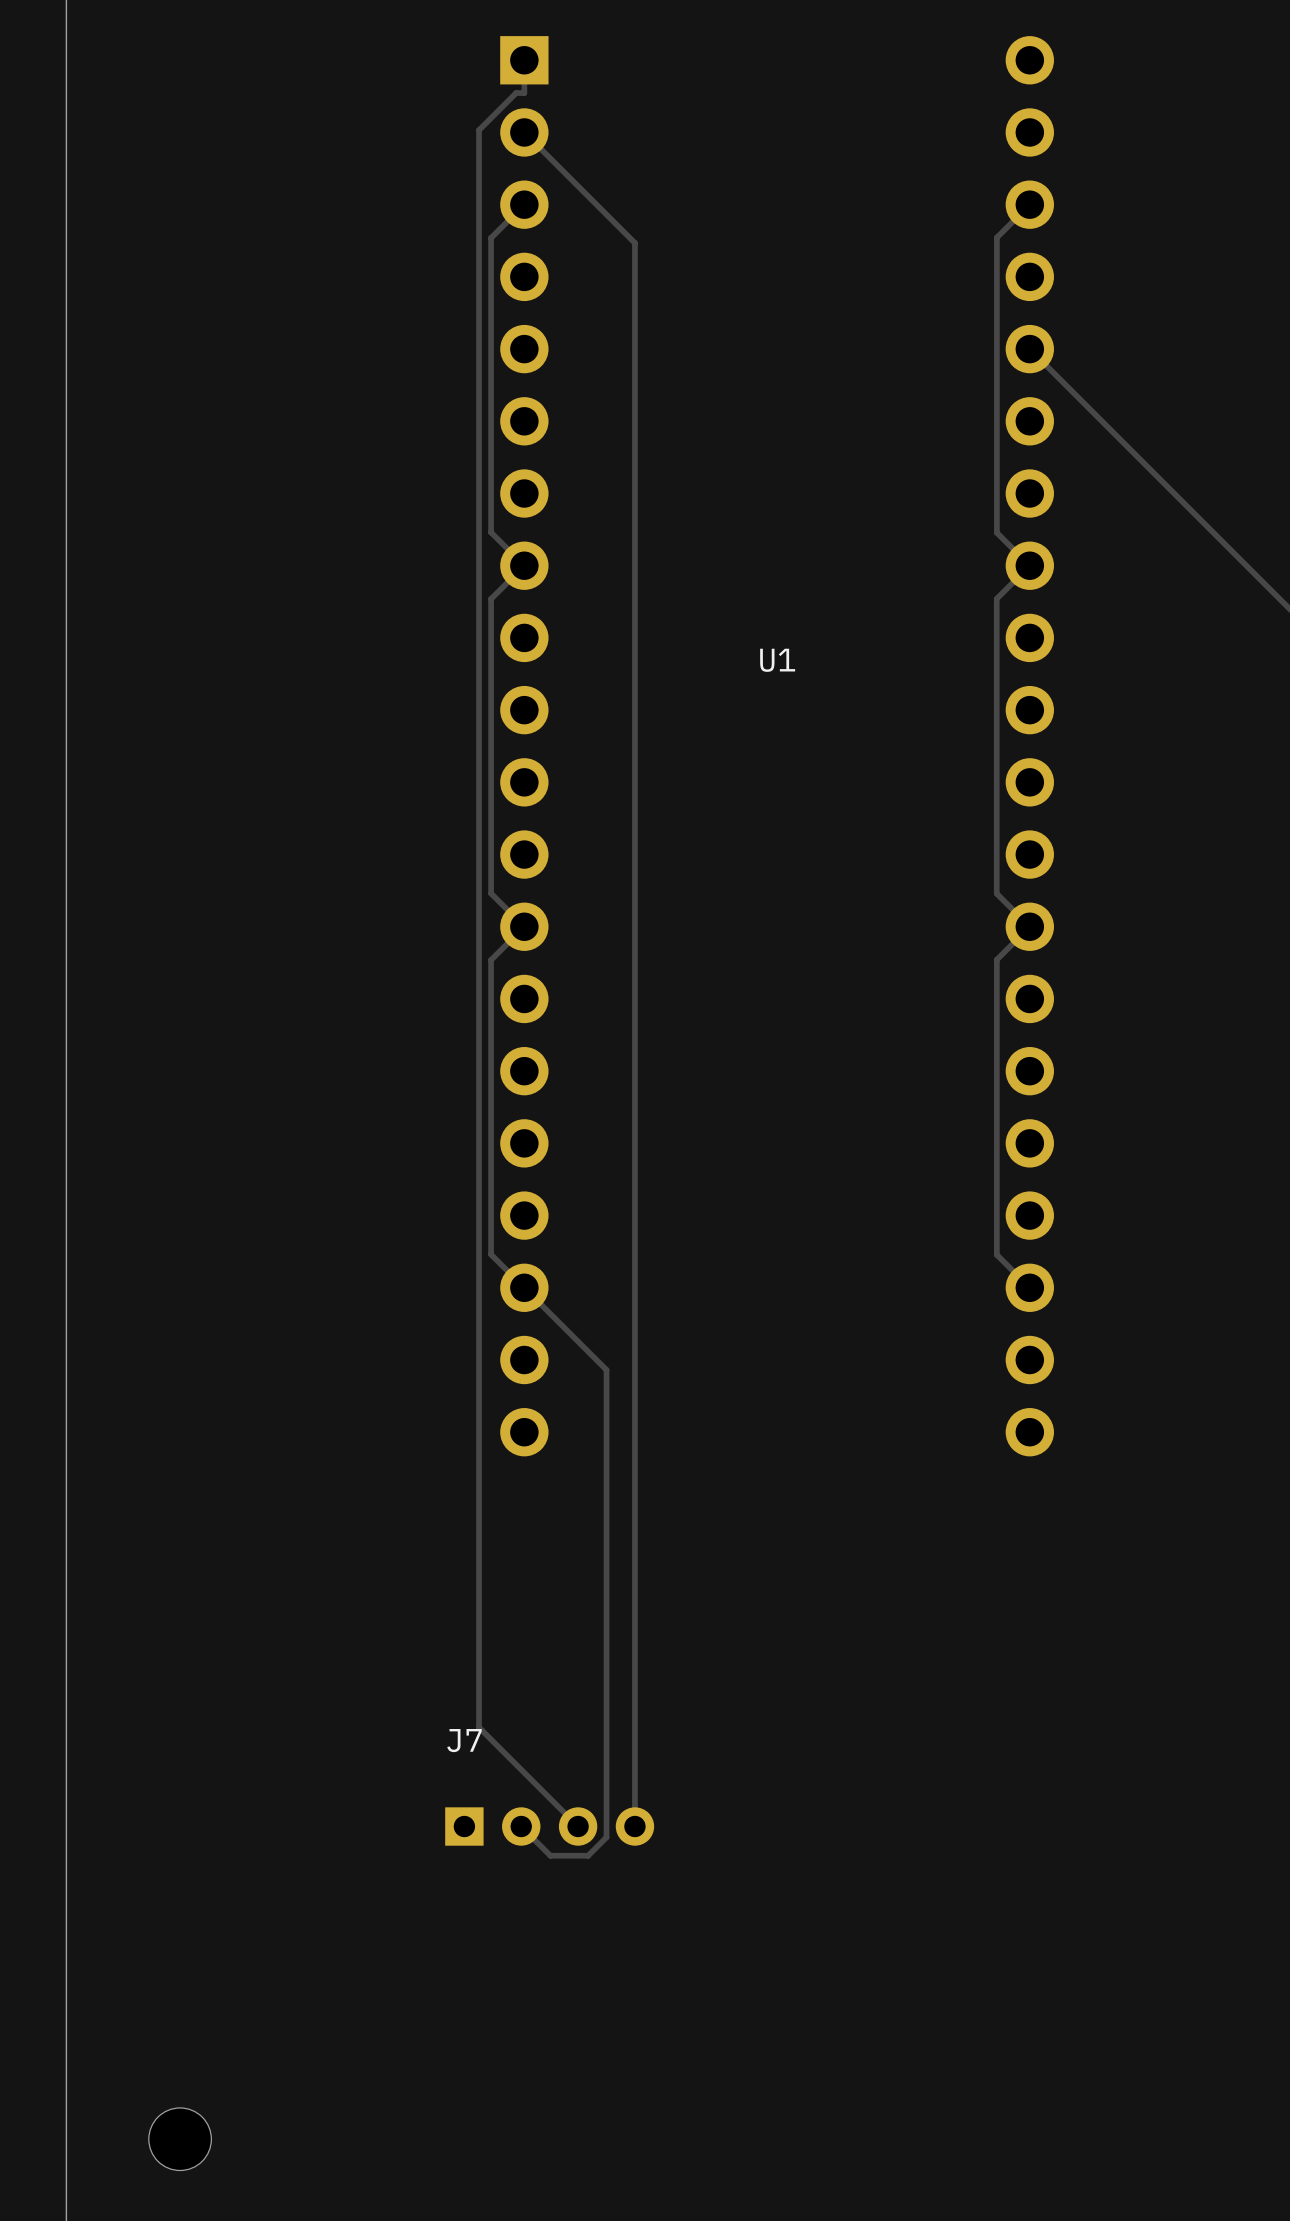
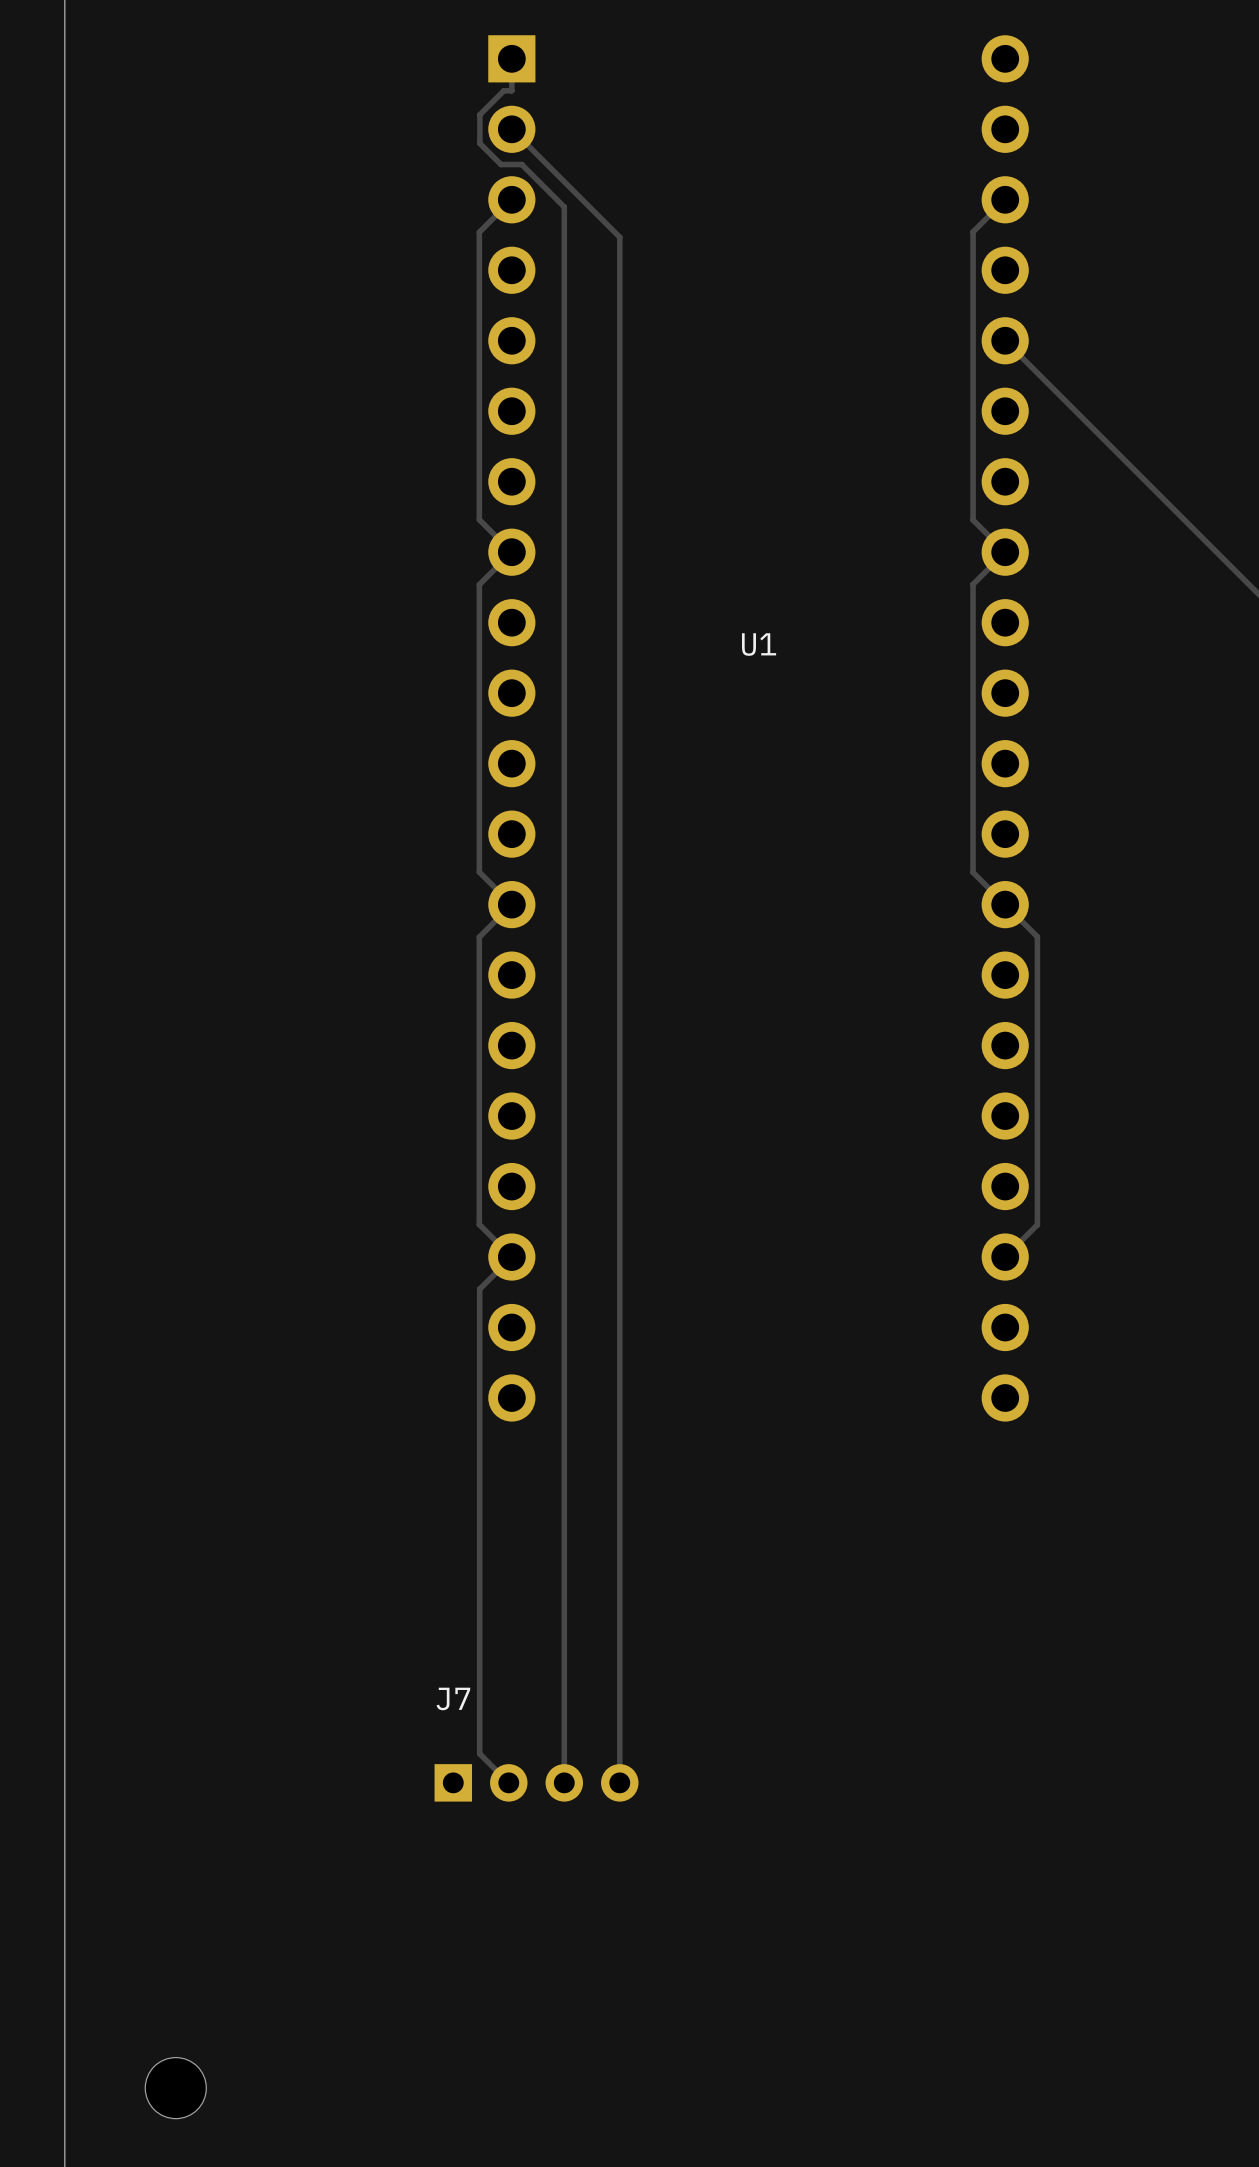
track: (491, 117) (479, 130) (479, 1727) (578, 1826) -> (479, 114) (479, 143) (500, 164) (521, 164) (564, 207) (564, 1782)
track: (1029, 926) (996, 959) (996, 1254) (1029, 1287) -> (1005, 904) (1037, 936) (1037, 1224) (1005, 1257)
track: (524, 1287) (606, 1369) (606, 1837) (588, 1855) (550, 1855) (521, 1826) -> (511, 1257) (479, 1289) (479, 1753) (508, 1782)

